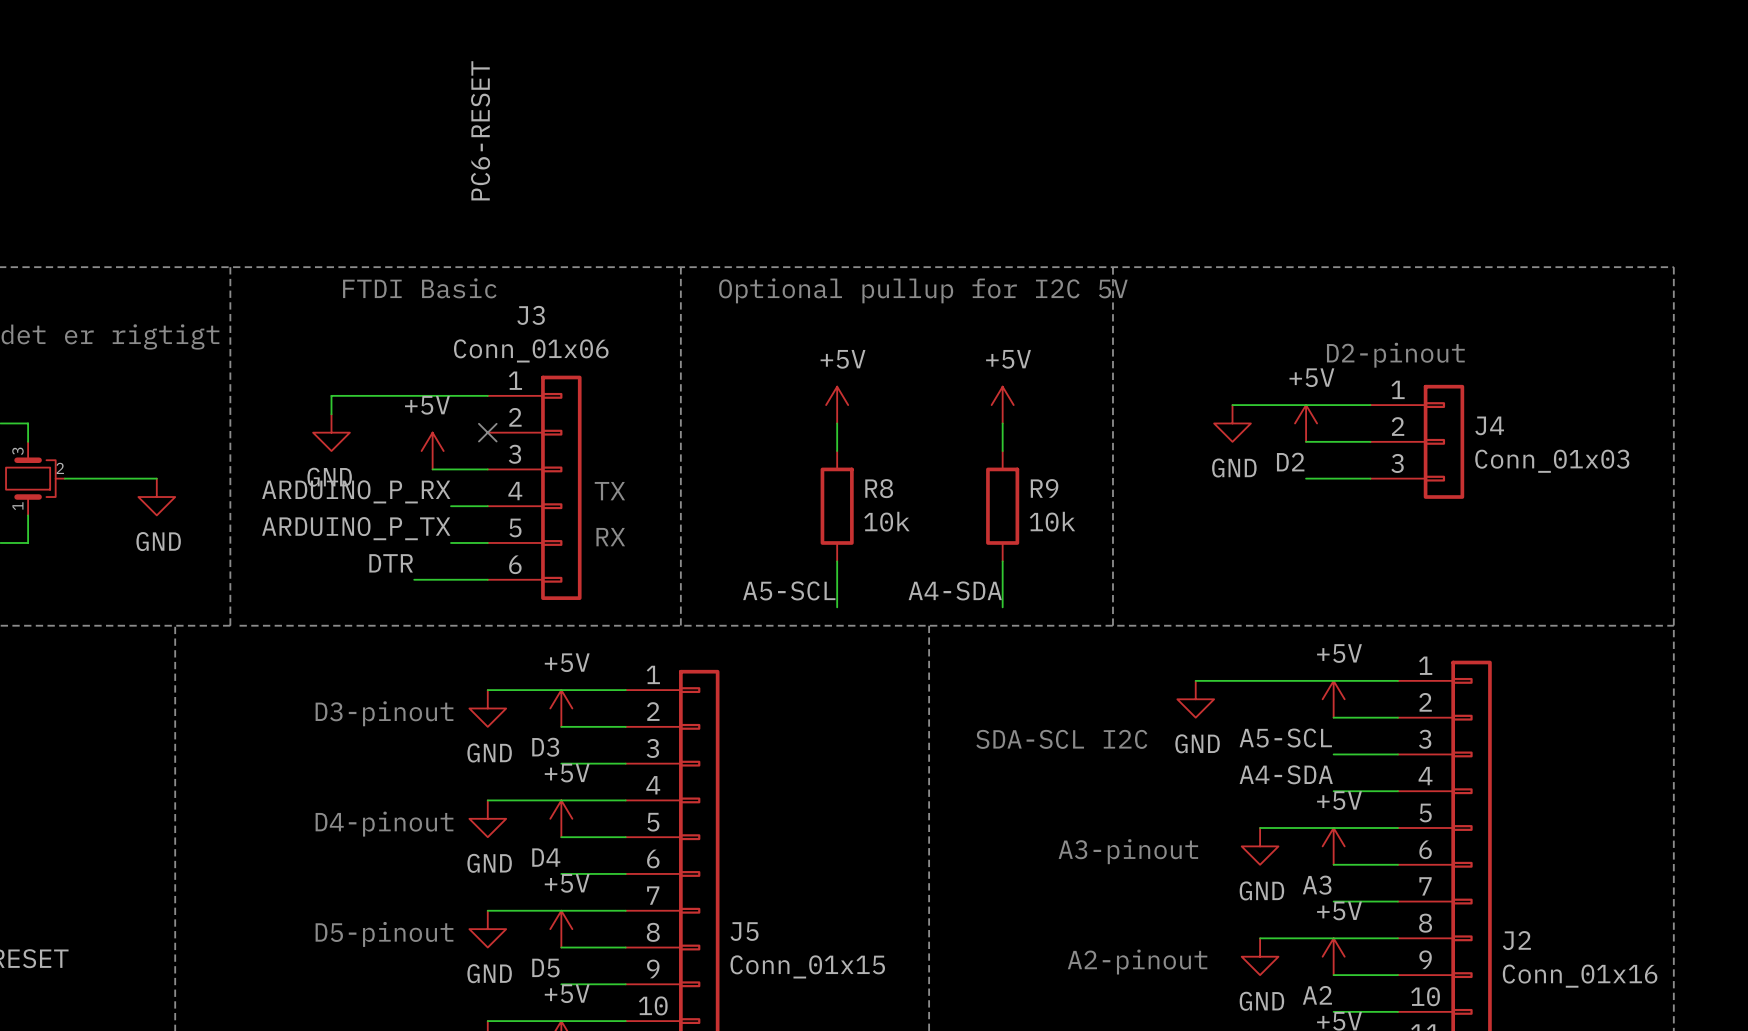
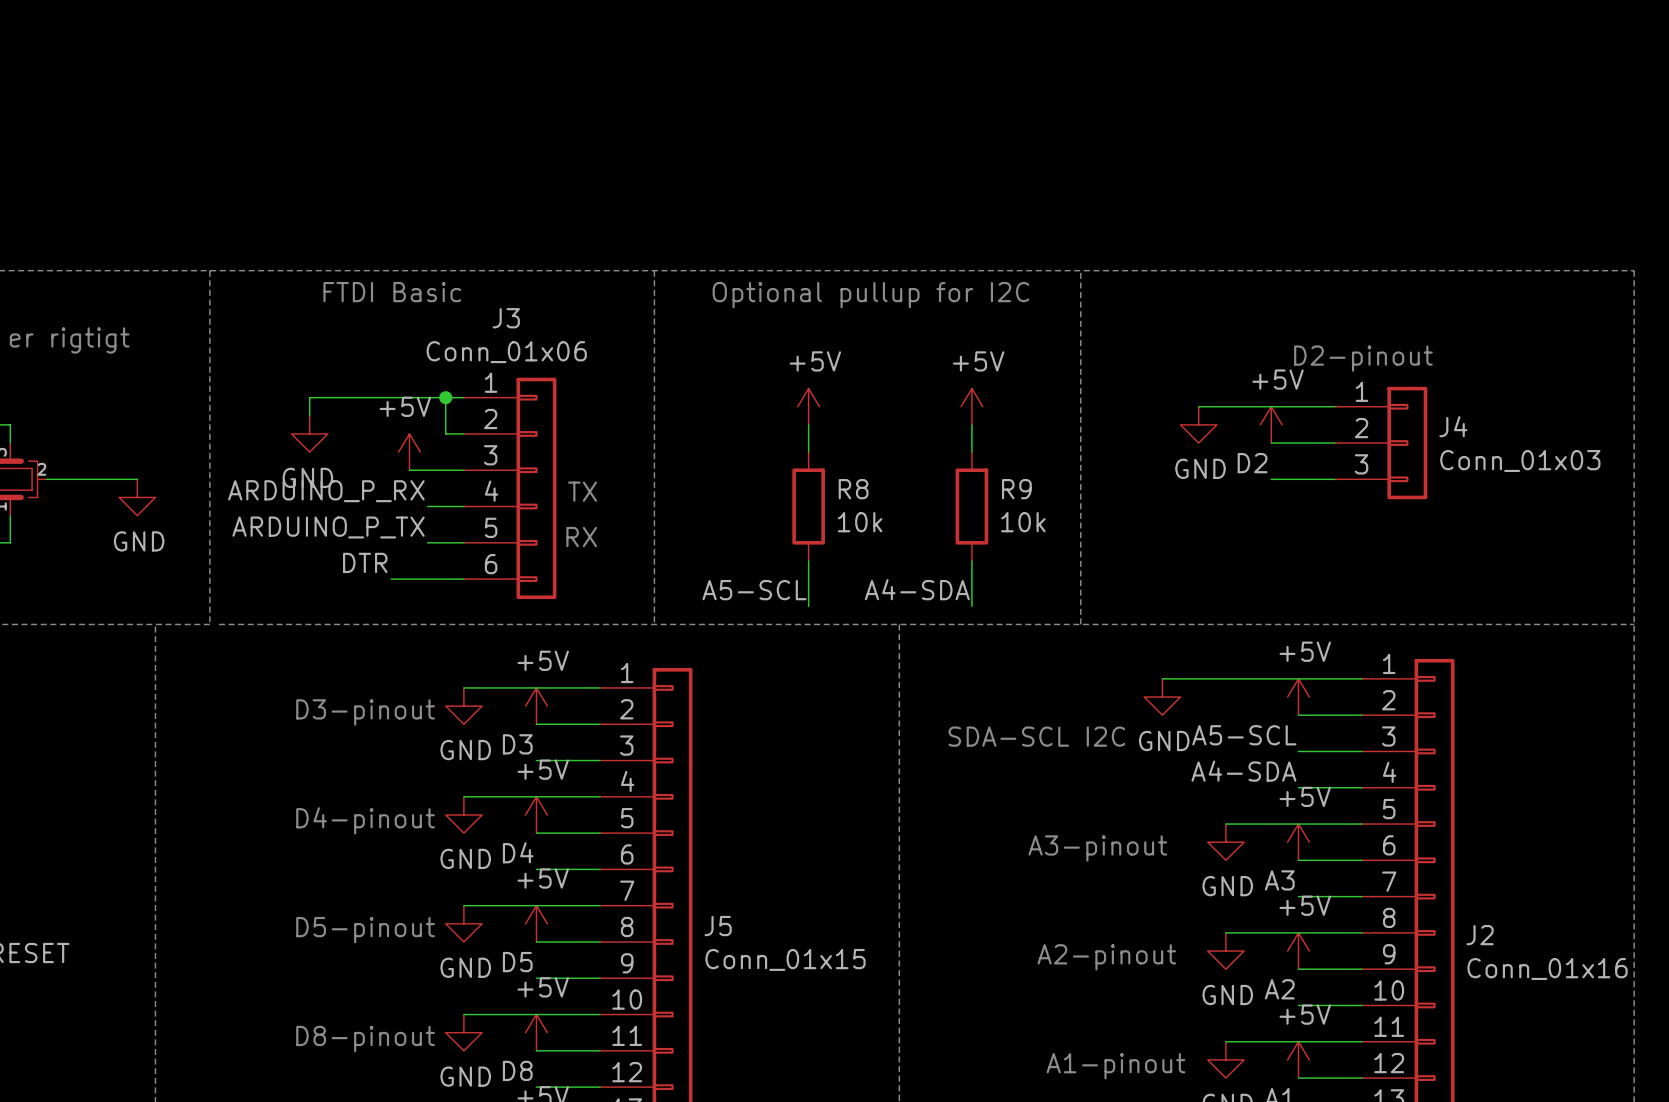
label: PC6-RESET (480, 130) -> none
text: Optional pullup for I2C 5V (923, 290) -> Optional pullup for I2C (870, 295)
wire: none -> (445, 397) (445, 433) (463, 433)
junction: none -> (445, 397)
no-connect mark: (487, 432) -> none

